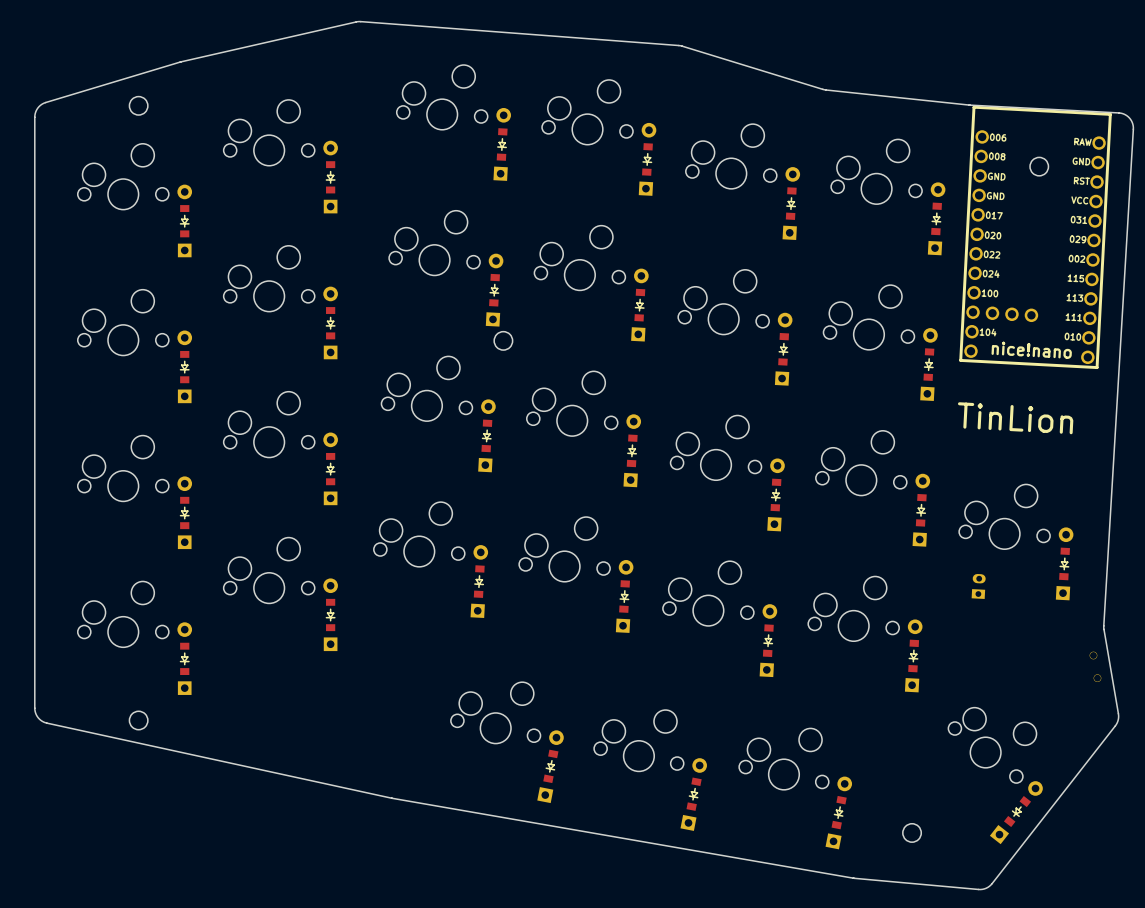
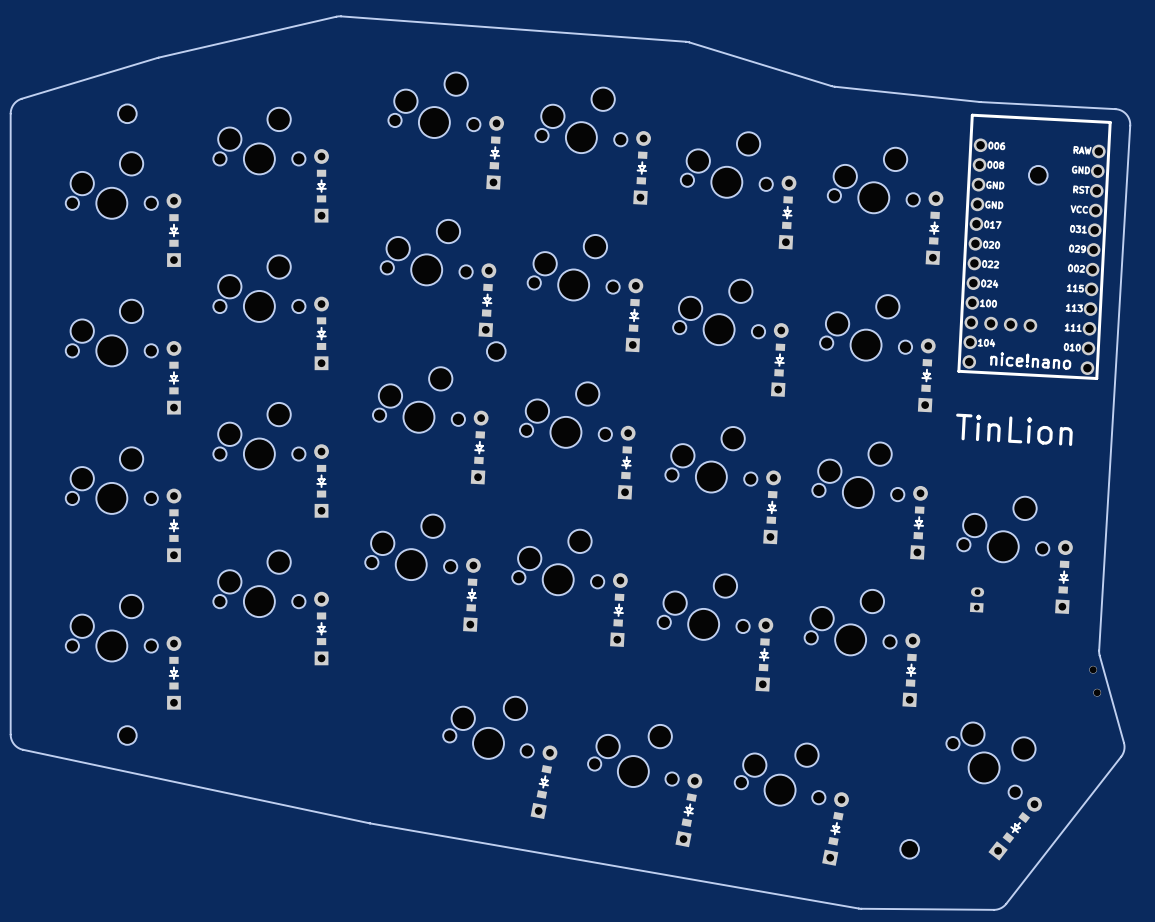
board edge: (34, 117) (34, 708) (37, 716) (42, 721) (392, 798) (853, 878) (980, 889) (992, 883) (1116, 724) (1118, 713) (1103, 625) (1133, 129) (1131, 120) (1125, 114) (969, 105) (824, 89) (678, 45) (359, 21) (180, 62) (43, 103) (36, 109) (34, 117) -> (10, 113) (10, 734) (13, 742) (18, 747) (369, 823) (858, 908) (993, 909) (1000, 908) (1006, 903) (1122, 755) (1123, 742) (1099, 651) (1130, 125) (1128, 117) (1122, 111) (980, 102) (833, 86) (685, 41) (339, 16) (157, 57) (19, 99) (13, 104) (10, 113)

